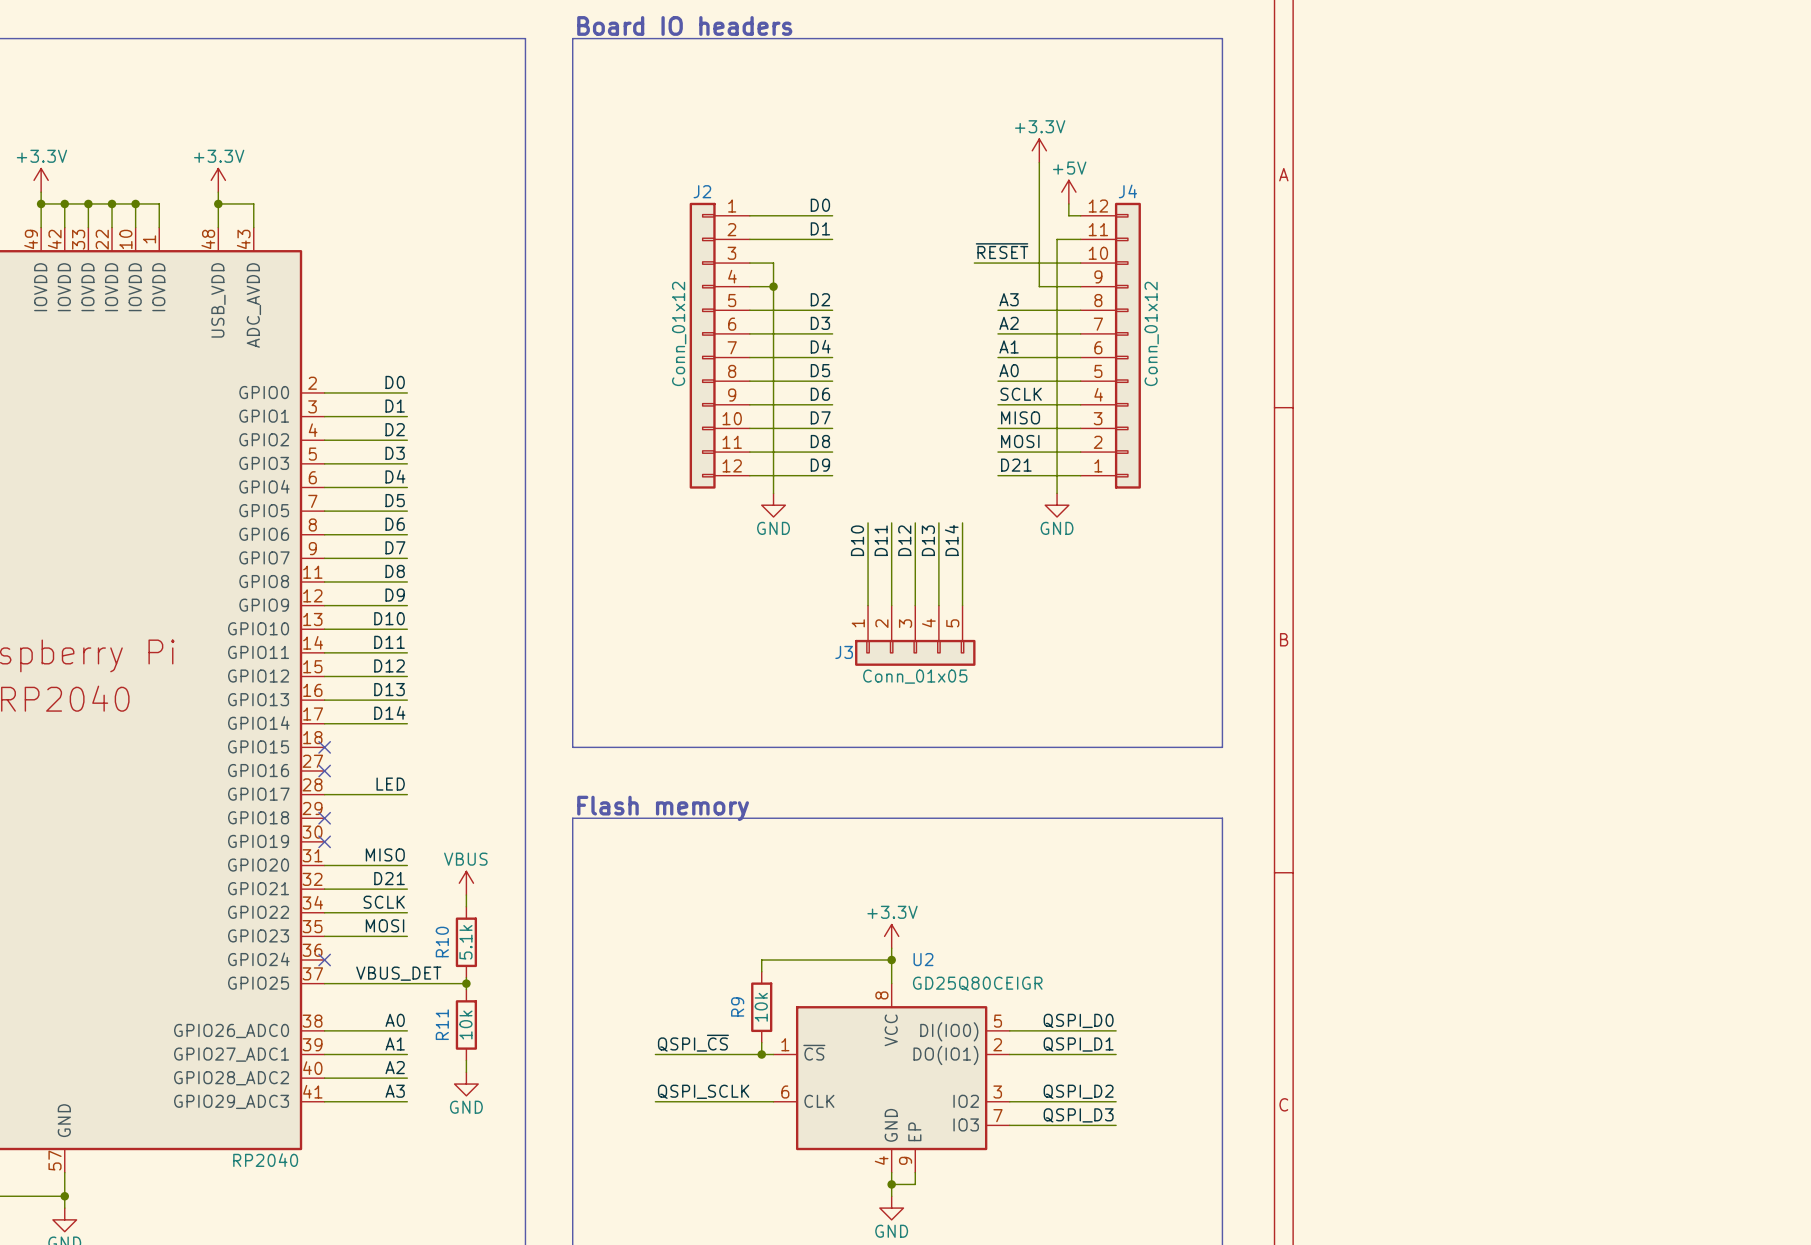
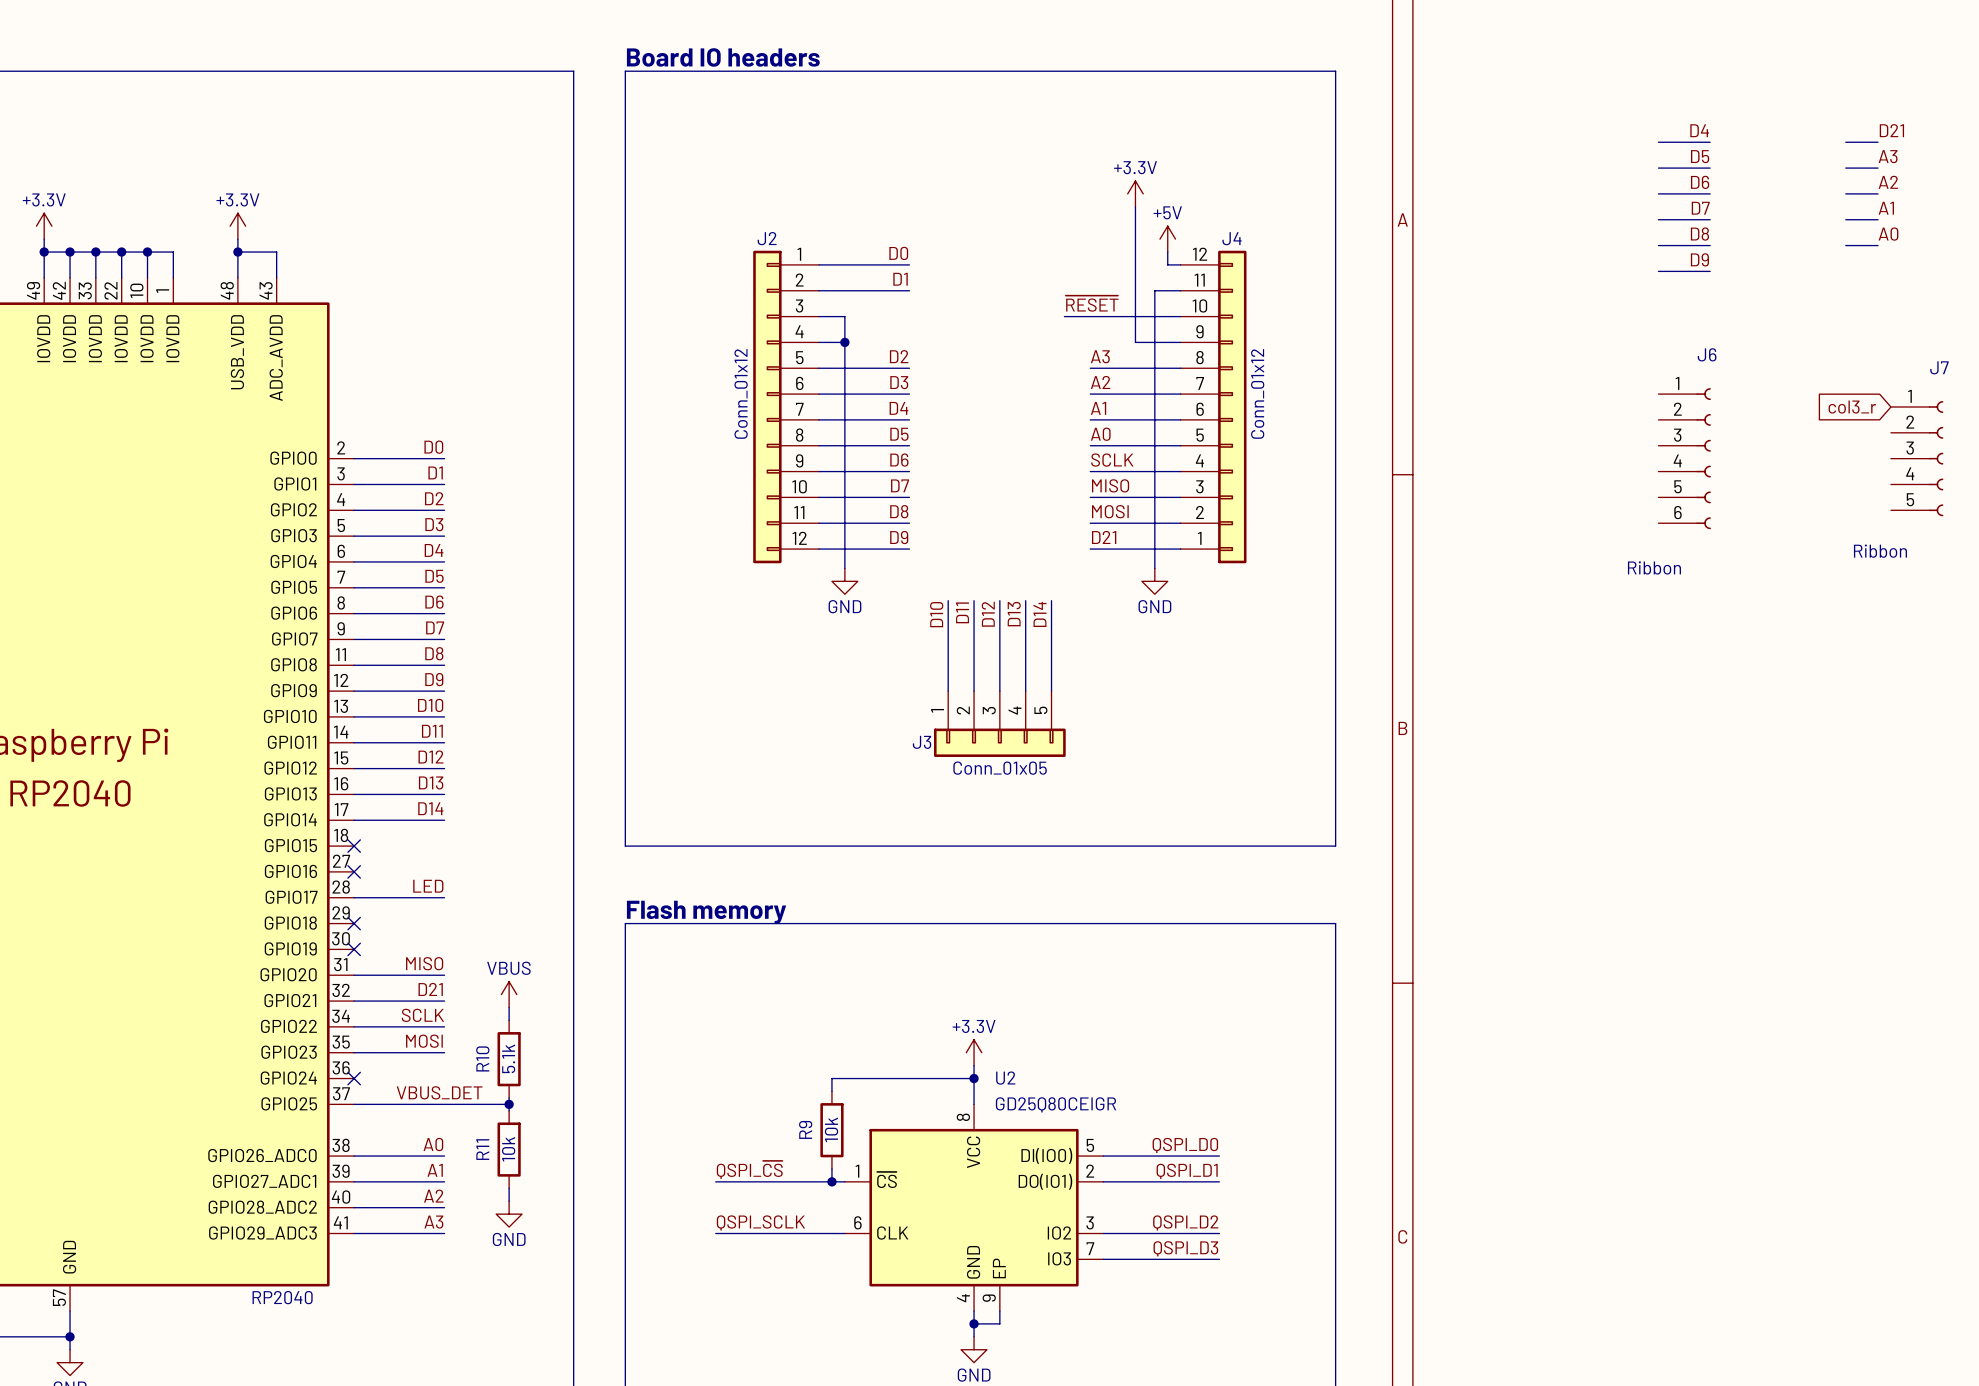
label: none -> D4 (1699, 130)
label: none -> D21 (1891, 130)
wire: none -> (1658, 142) (1710, 142)
wire: none -> (1845, 142) (1878, 142)
label: none -> D5 (1700, 156)
label: none -> A3 (1888, 156)
wire: none -> (1658, 168) (1710, 168)
wire: none -> (1845, 168) (1878, 168)
label: none -> D6 (1700, 182)
label: none -> A2 (1888, 182)
wire: none -> (1658, 193) (1710, 193)
wire: none -> (1845, 193) (1878, 193)
label: none -> D7 (1700, 208)
label: none -> A1 (1886, 208)
wire: none -> (1658, 219) (1710, 219)
wire: none -> (1845, 219) (1878, 219)
label: none -> D8 (1699, 234)
label: none -> A0 (1888, 234)
wire: none -> (1658, 245) (1710, 245)
wire: none -> (1845, 245) (1878, 245)
label: none -> D9 (1699, 259)
wire: none -> (1658, 271) (1710, 271)
global label: none -> col3_r (1852, 407)
J6: none -> Ribbon (1684, 458)
J7: none -> Ribbon (1917, 458)

